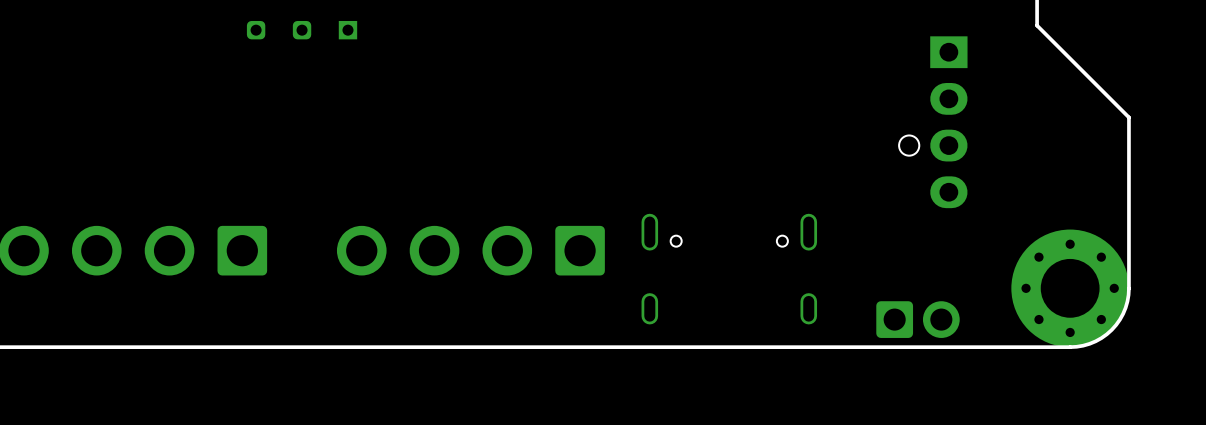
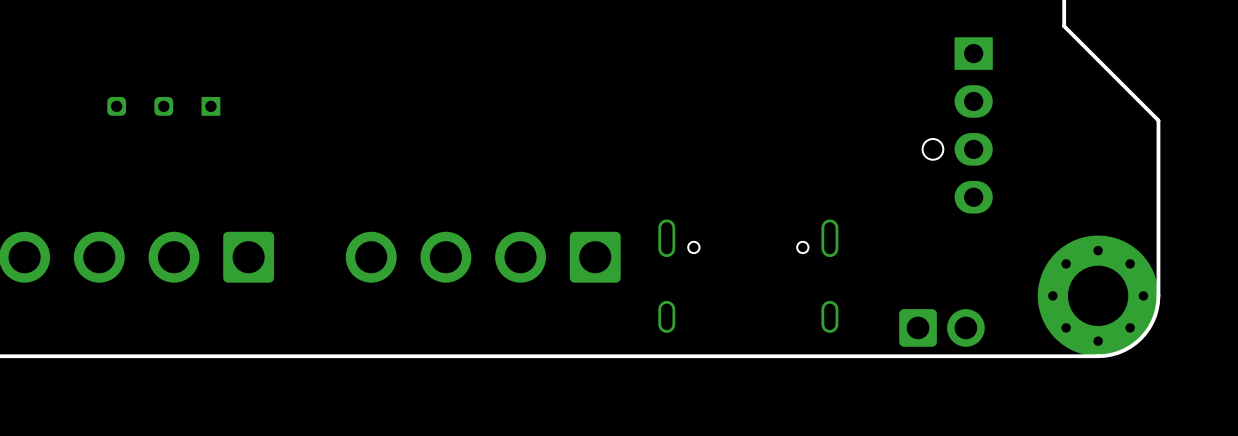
part position: (302, 30) -> (163, 106)

